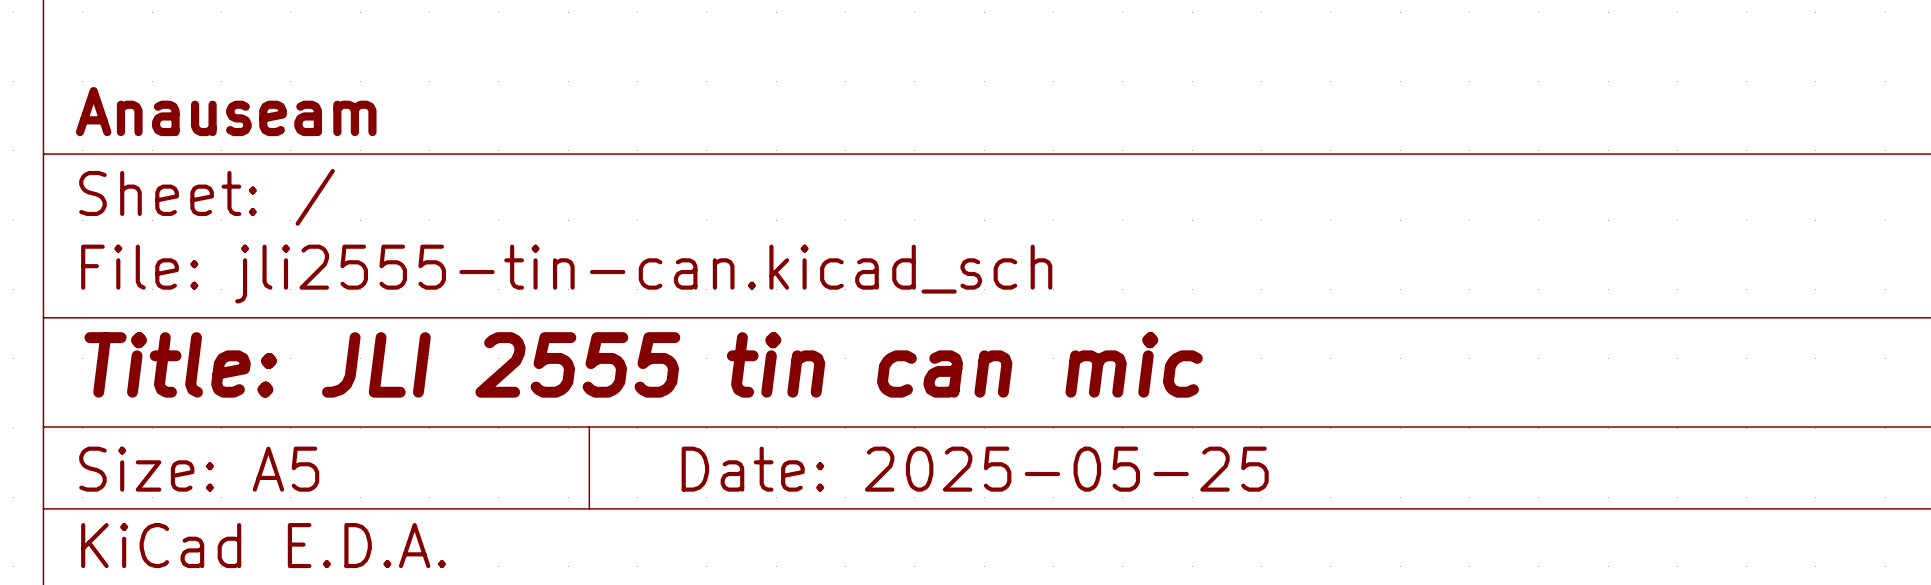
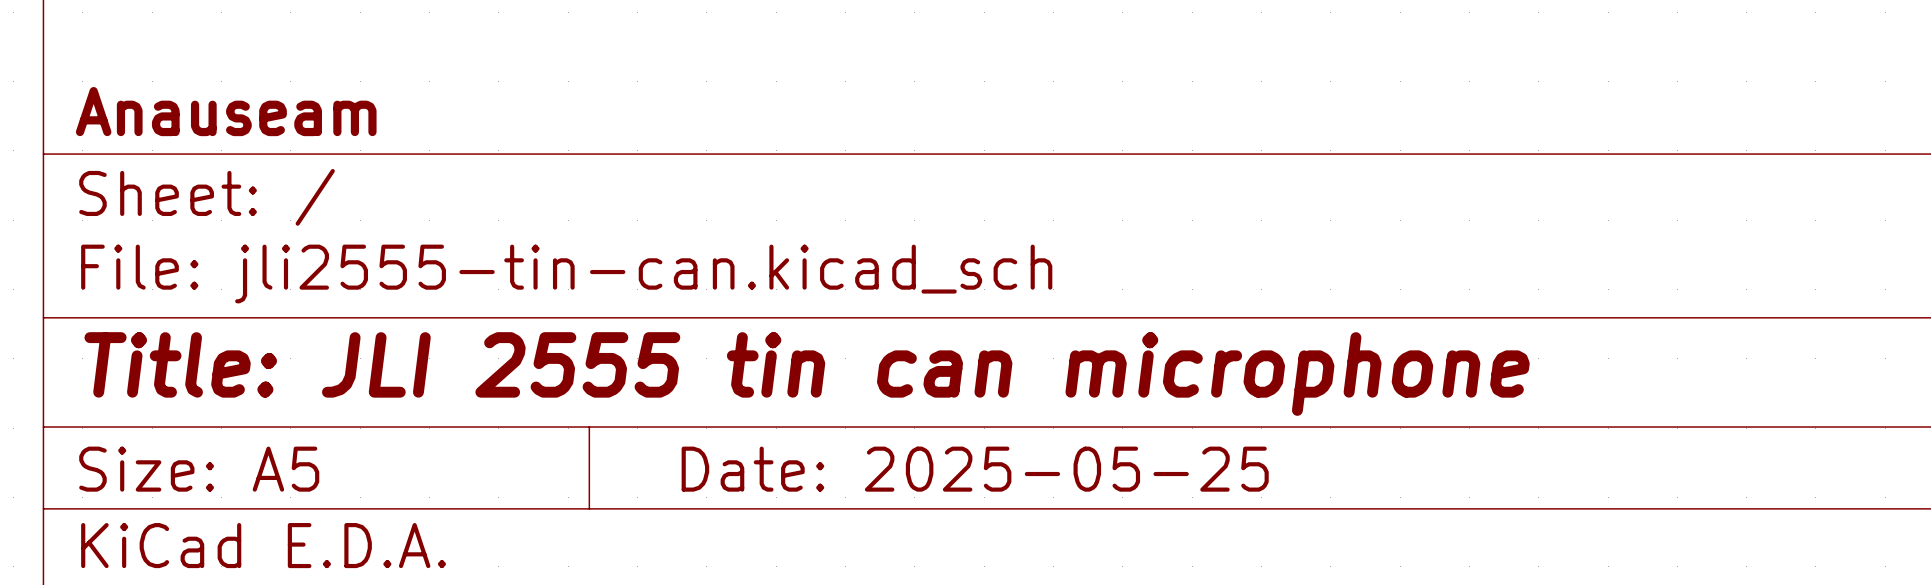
title block: Title: JLI 2555 tin can mic (643, 364) -> Title: JLI 2555 tin can microphone (807, 374)

